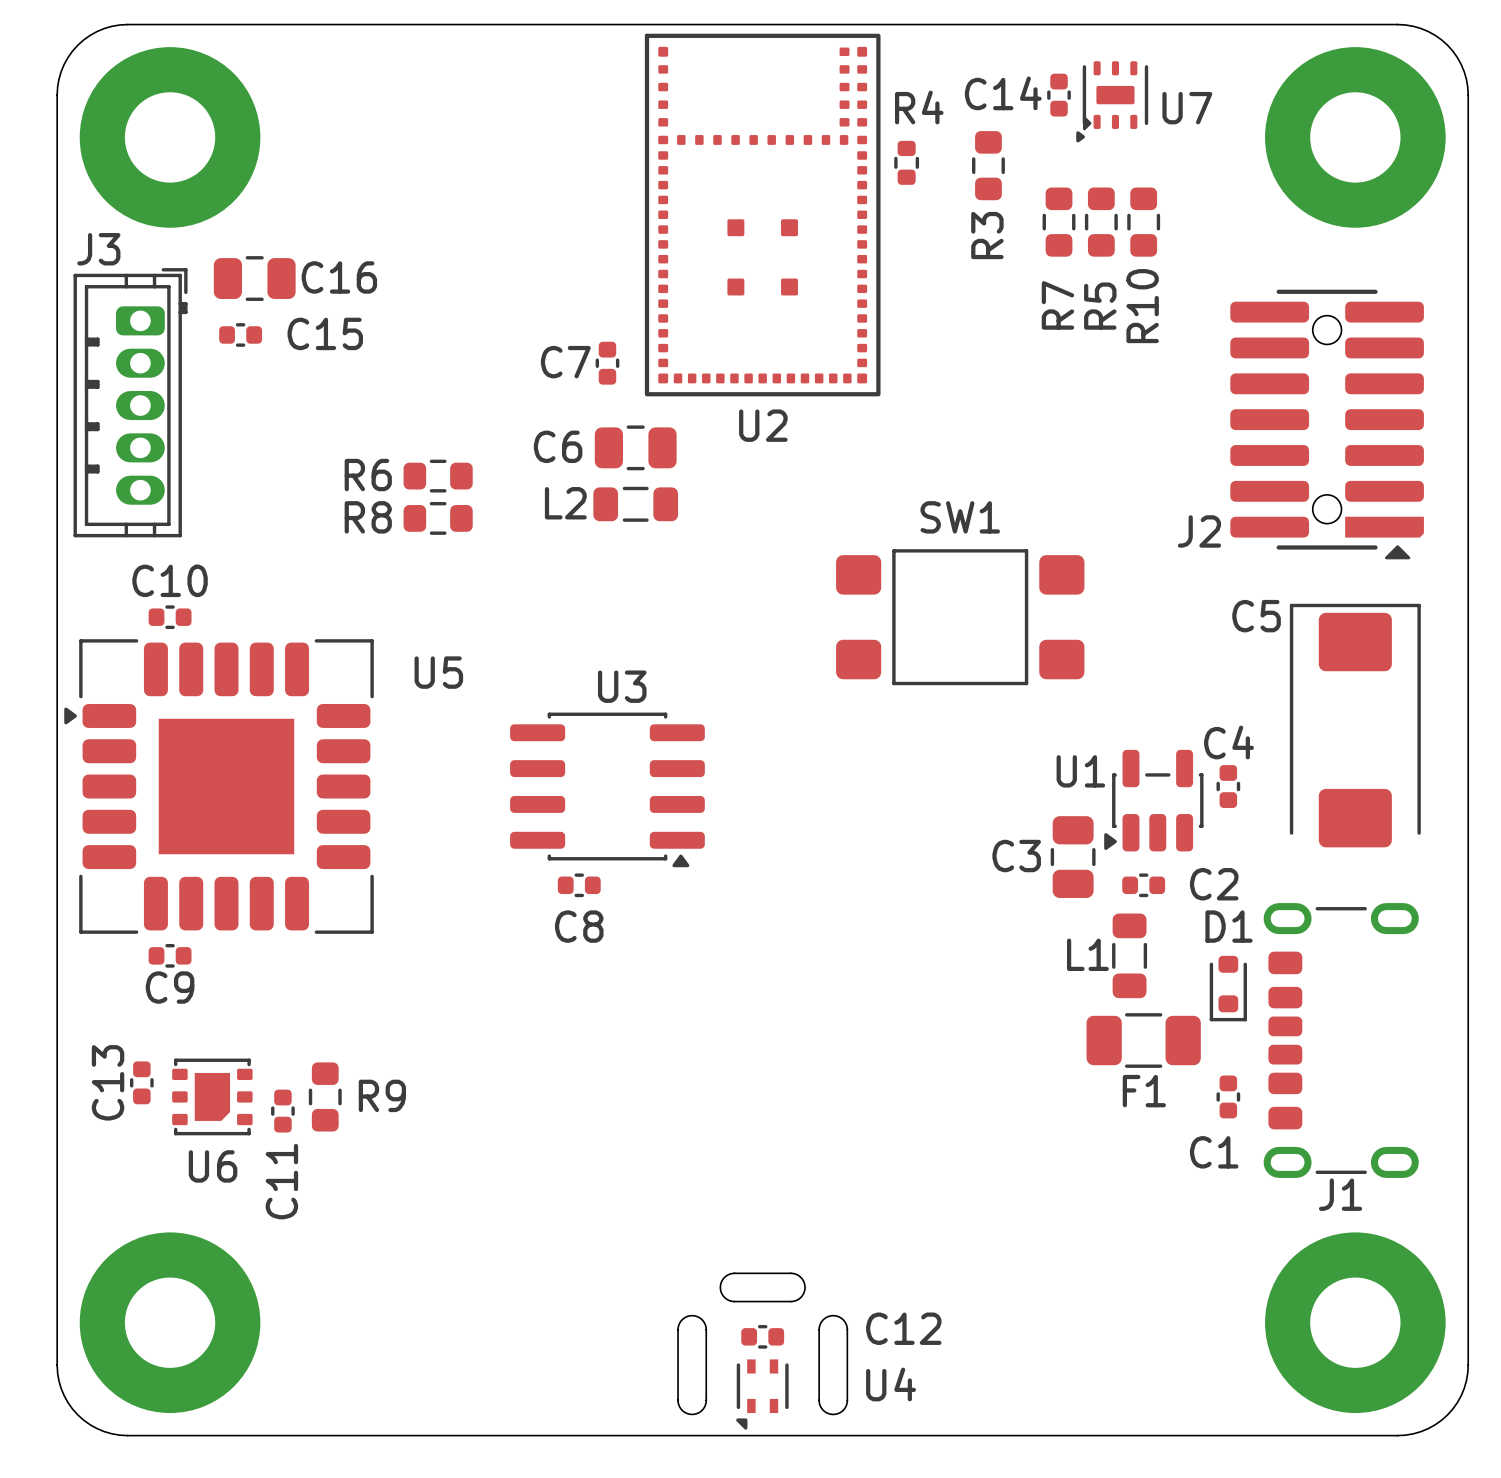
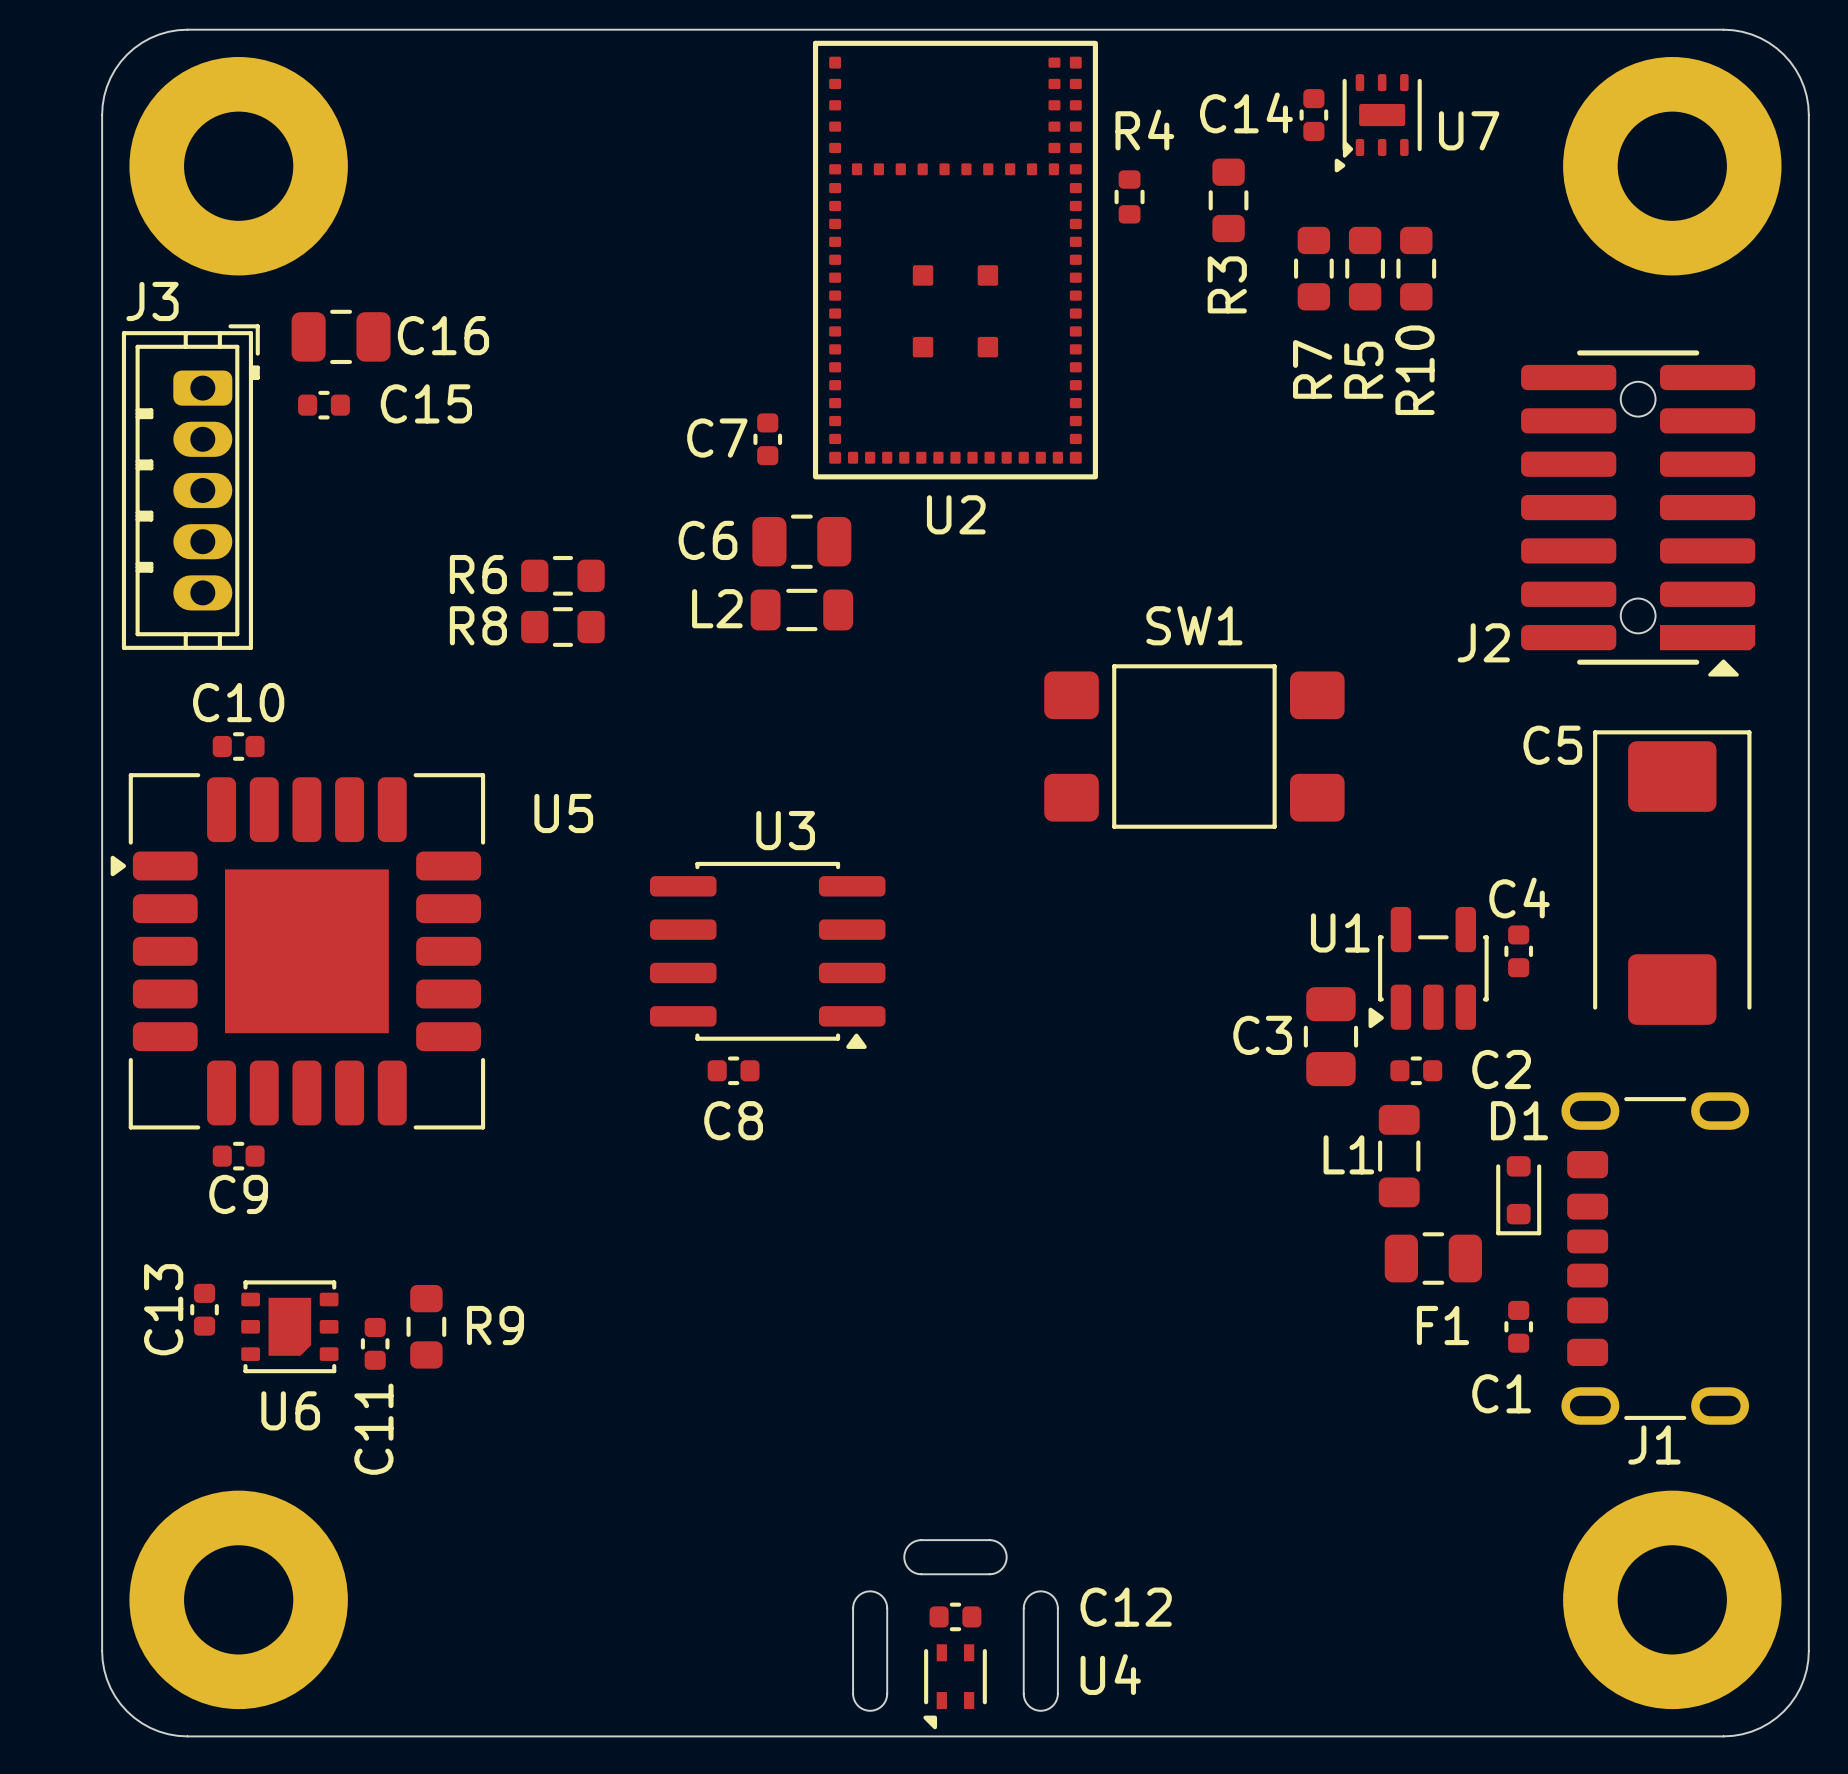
F1 footprint: [1086, 1013, 1201, 1068] -> [1384, 1232, 1483, 1285]

